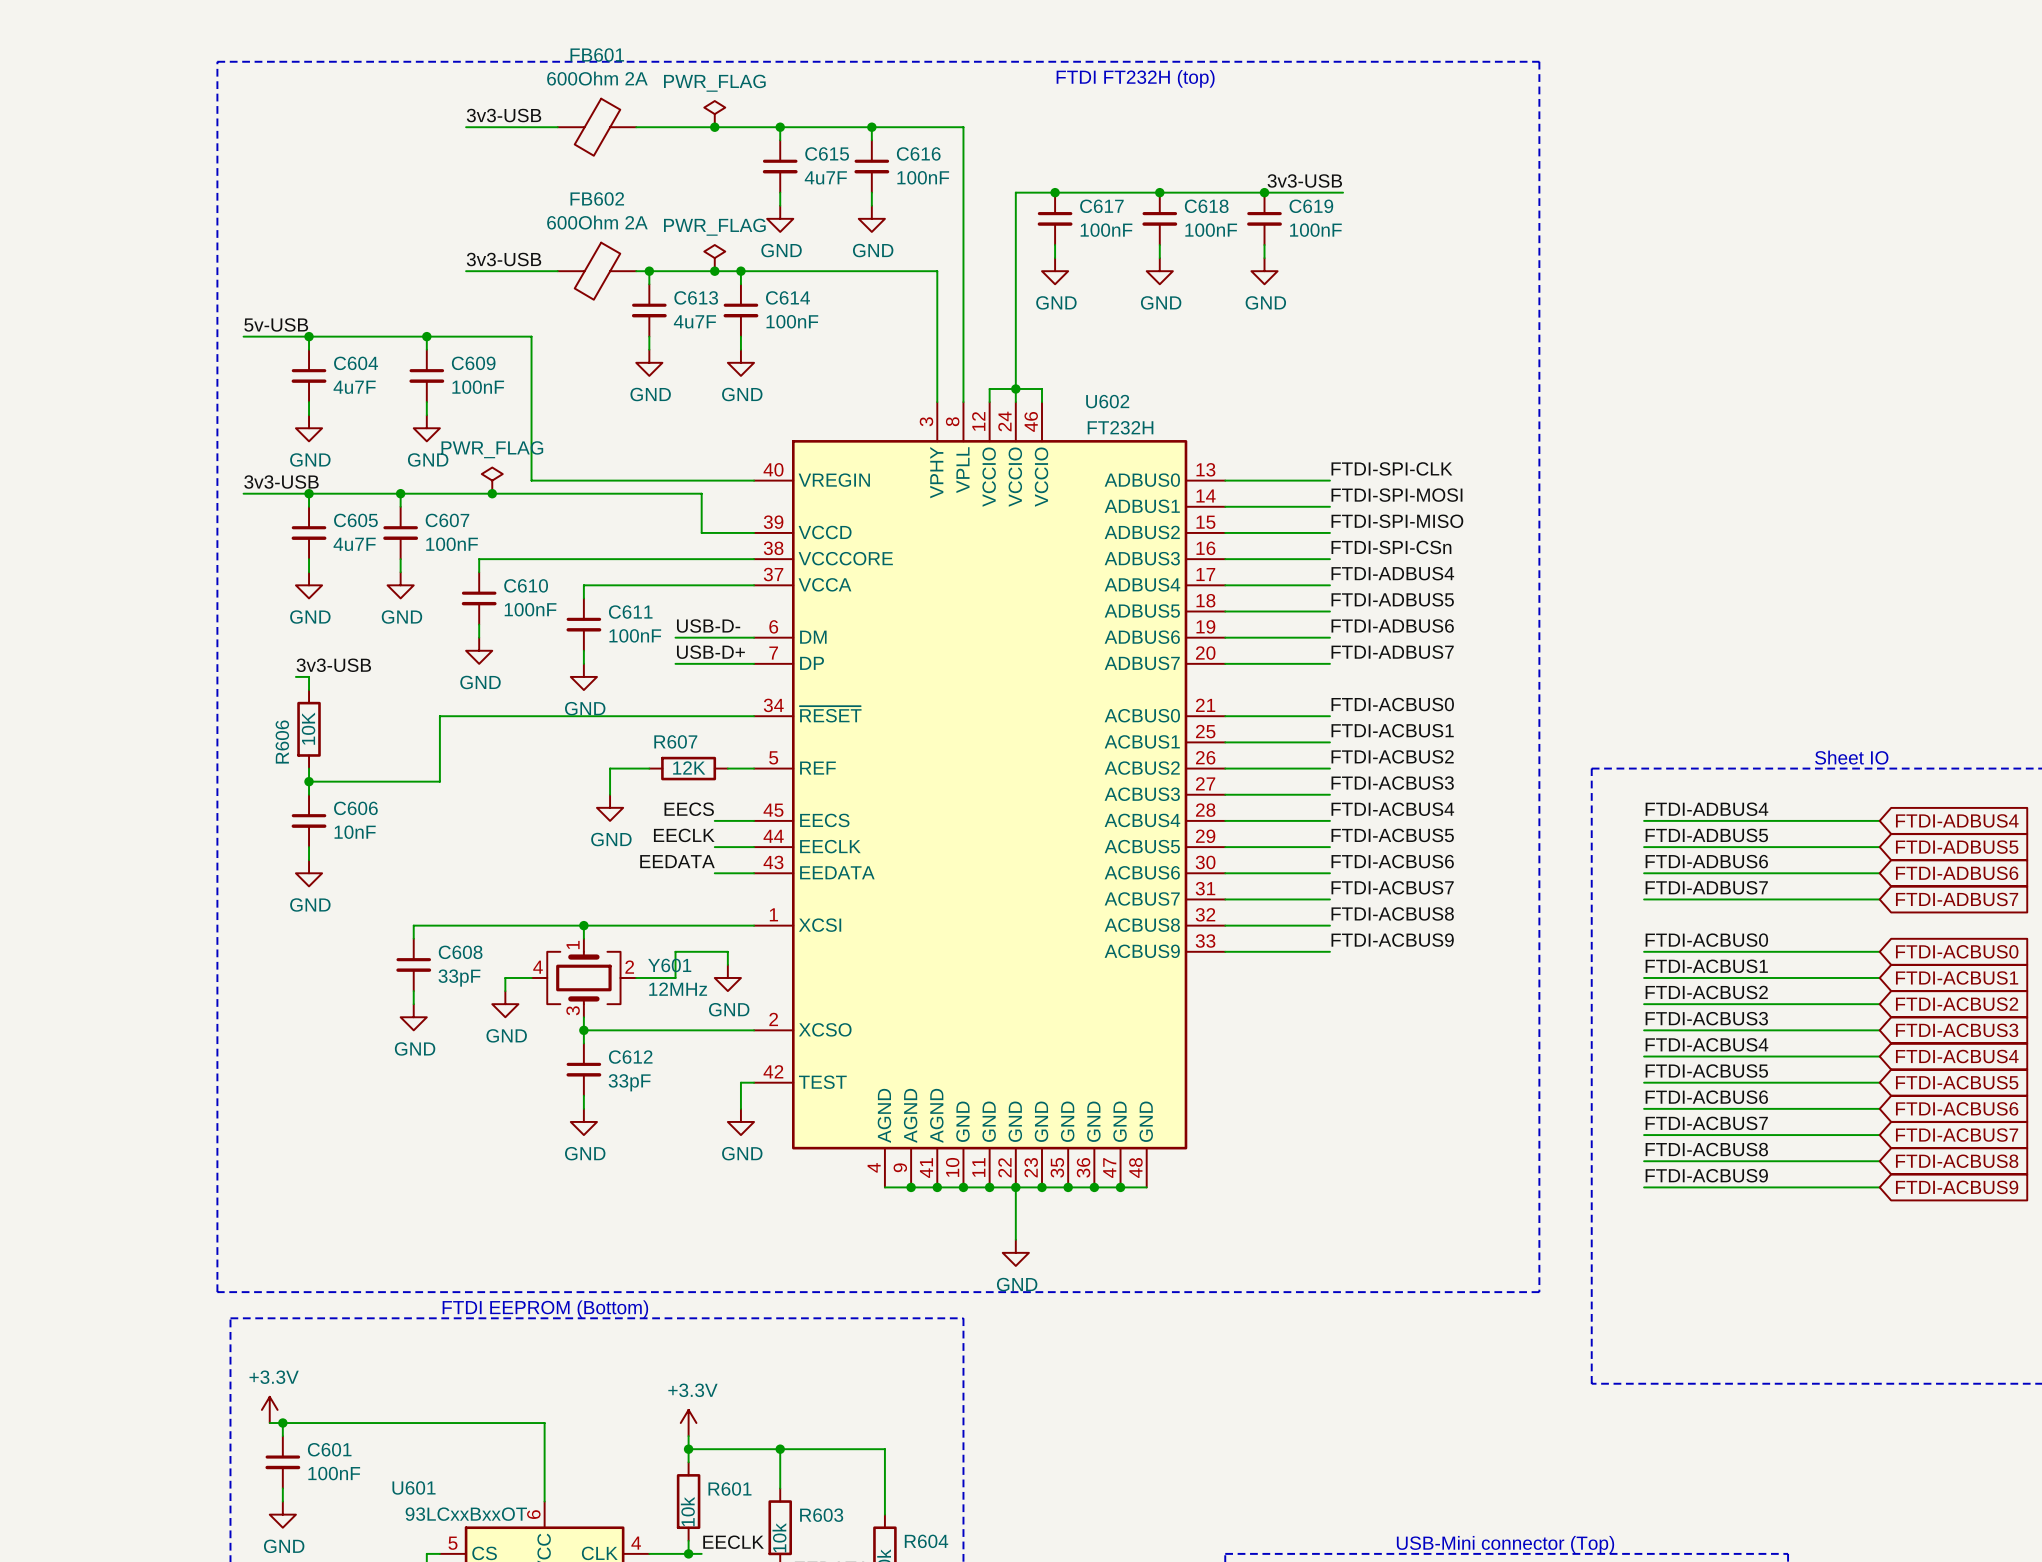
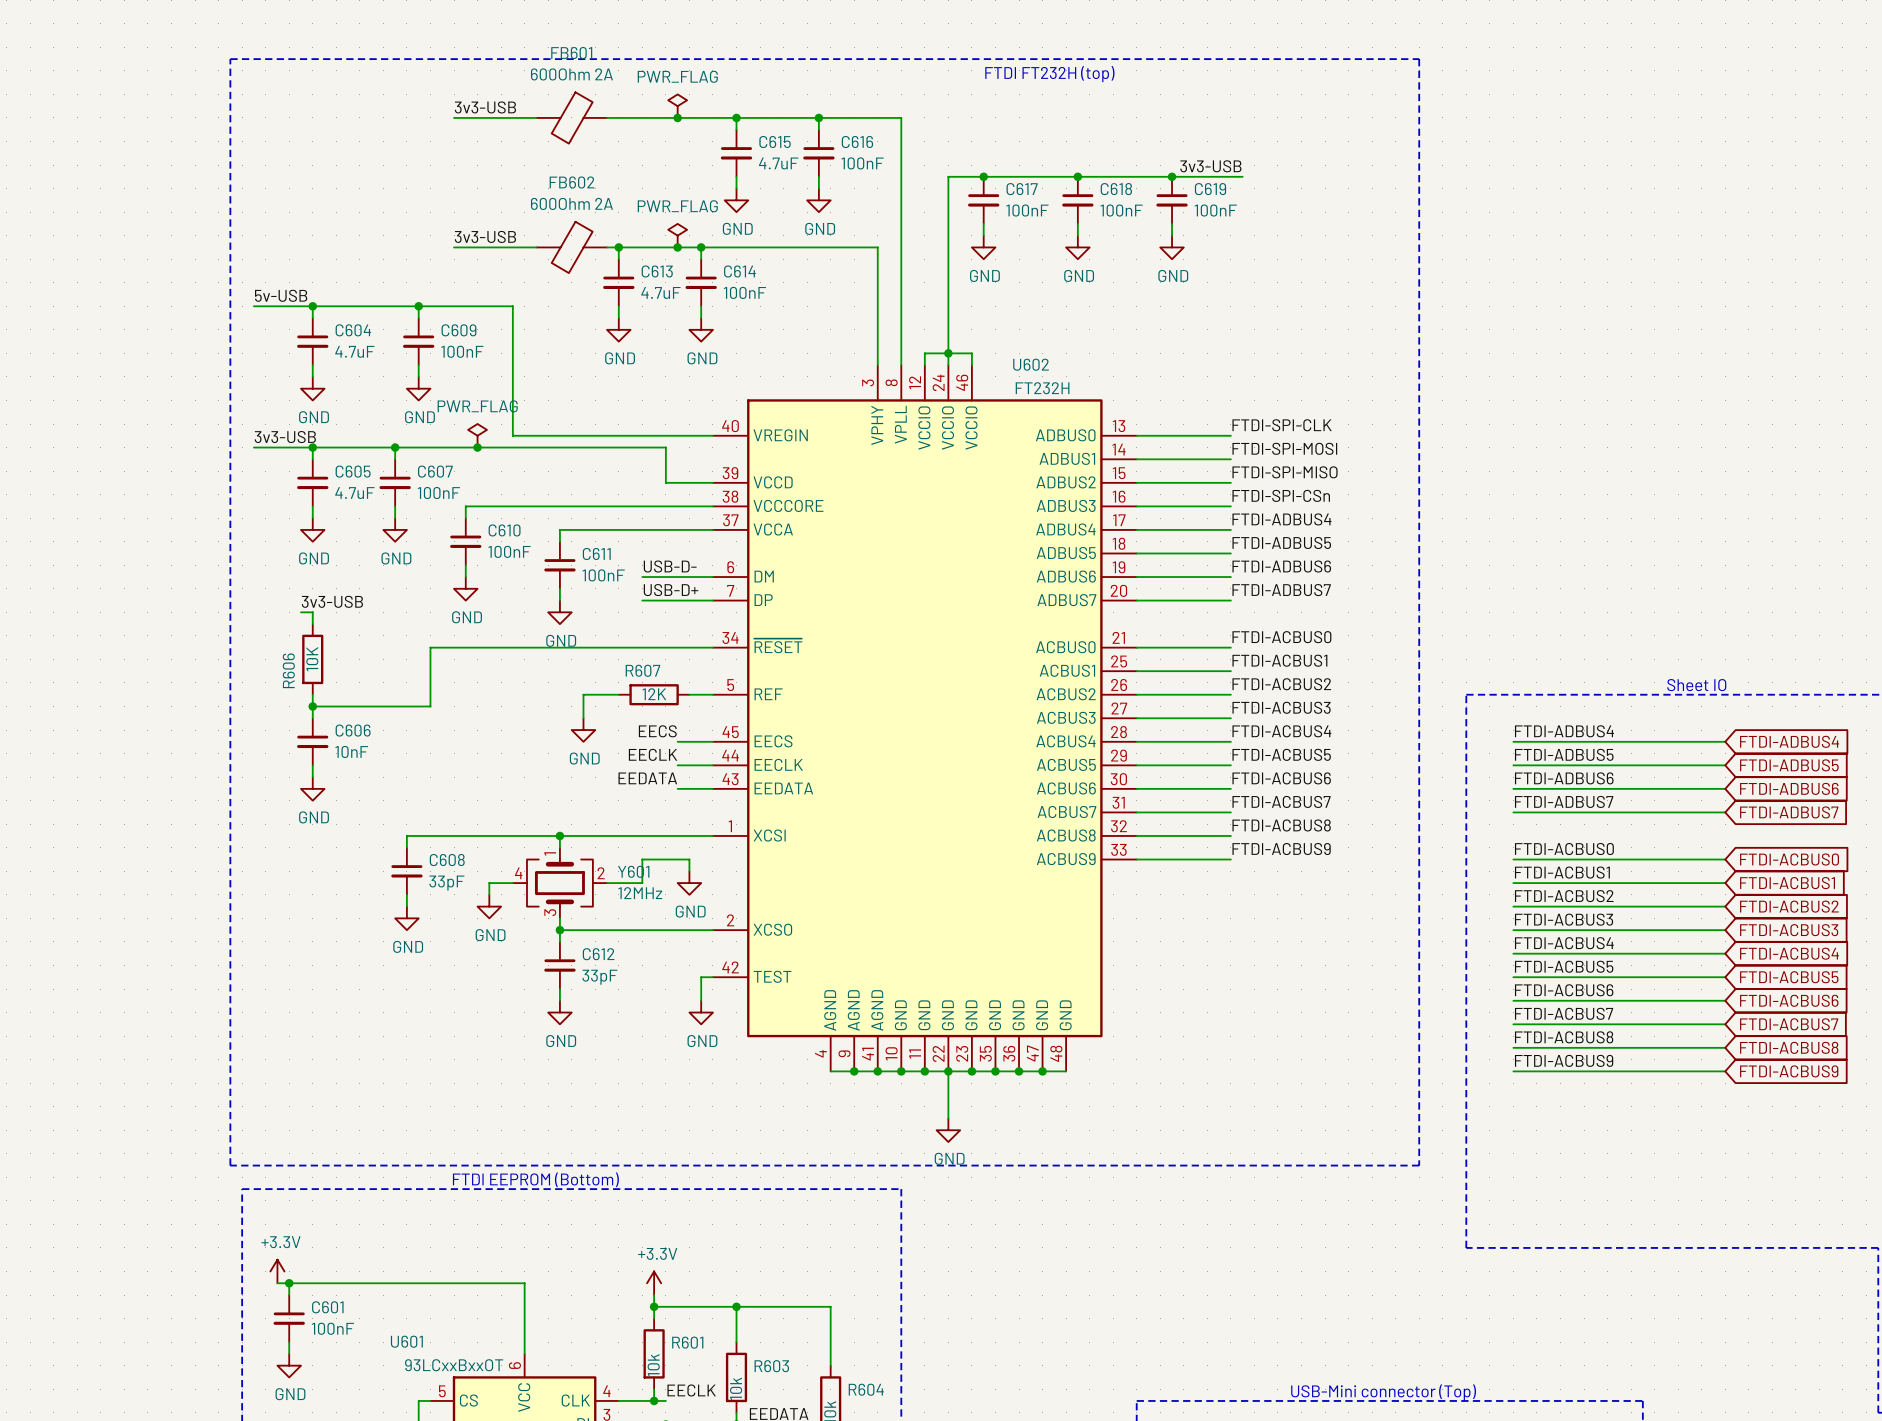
C615 value: 4u7F (825, 177) -> 4.7uF (778, 163)
C613 value: 4u7F (694, 321) -> 4.7uF (660, 292)
C604 value: 4u7F (354, 387) -> 4.7uF (354, 351)
C605 value: 4u7F (354, 544) -> 4.7uF (354, 493)

